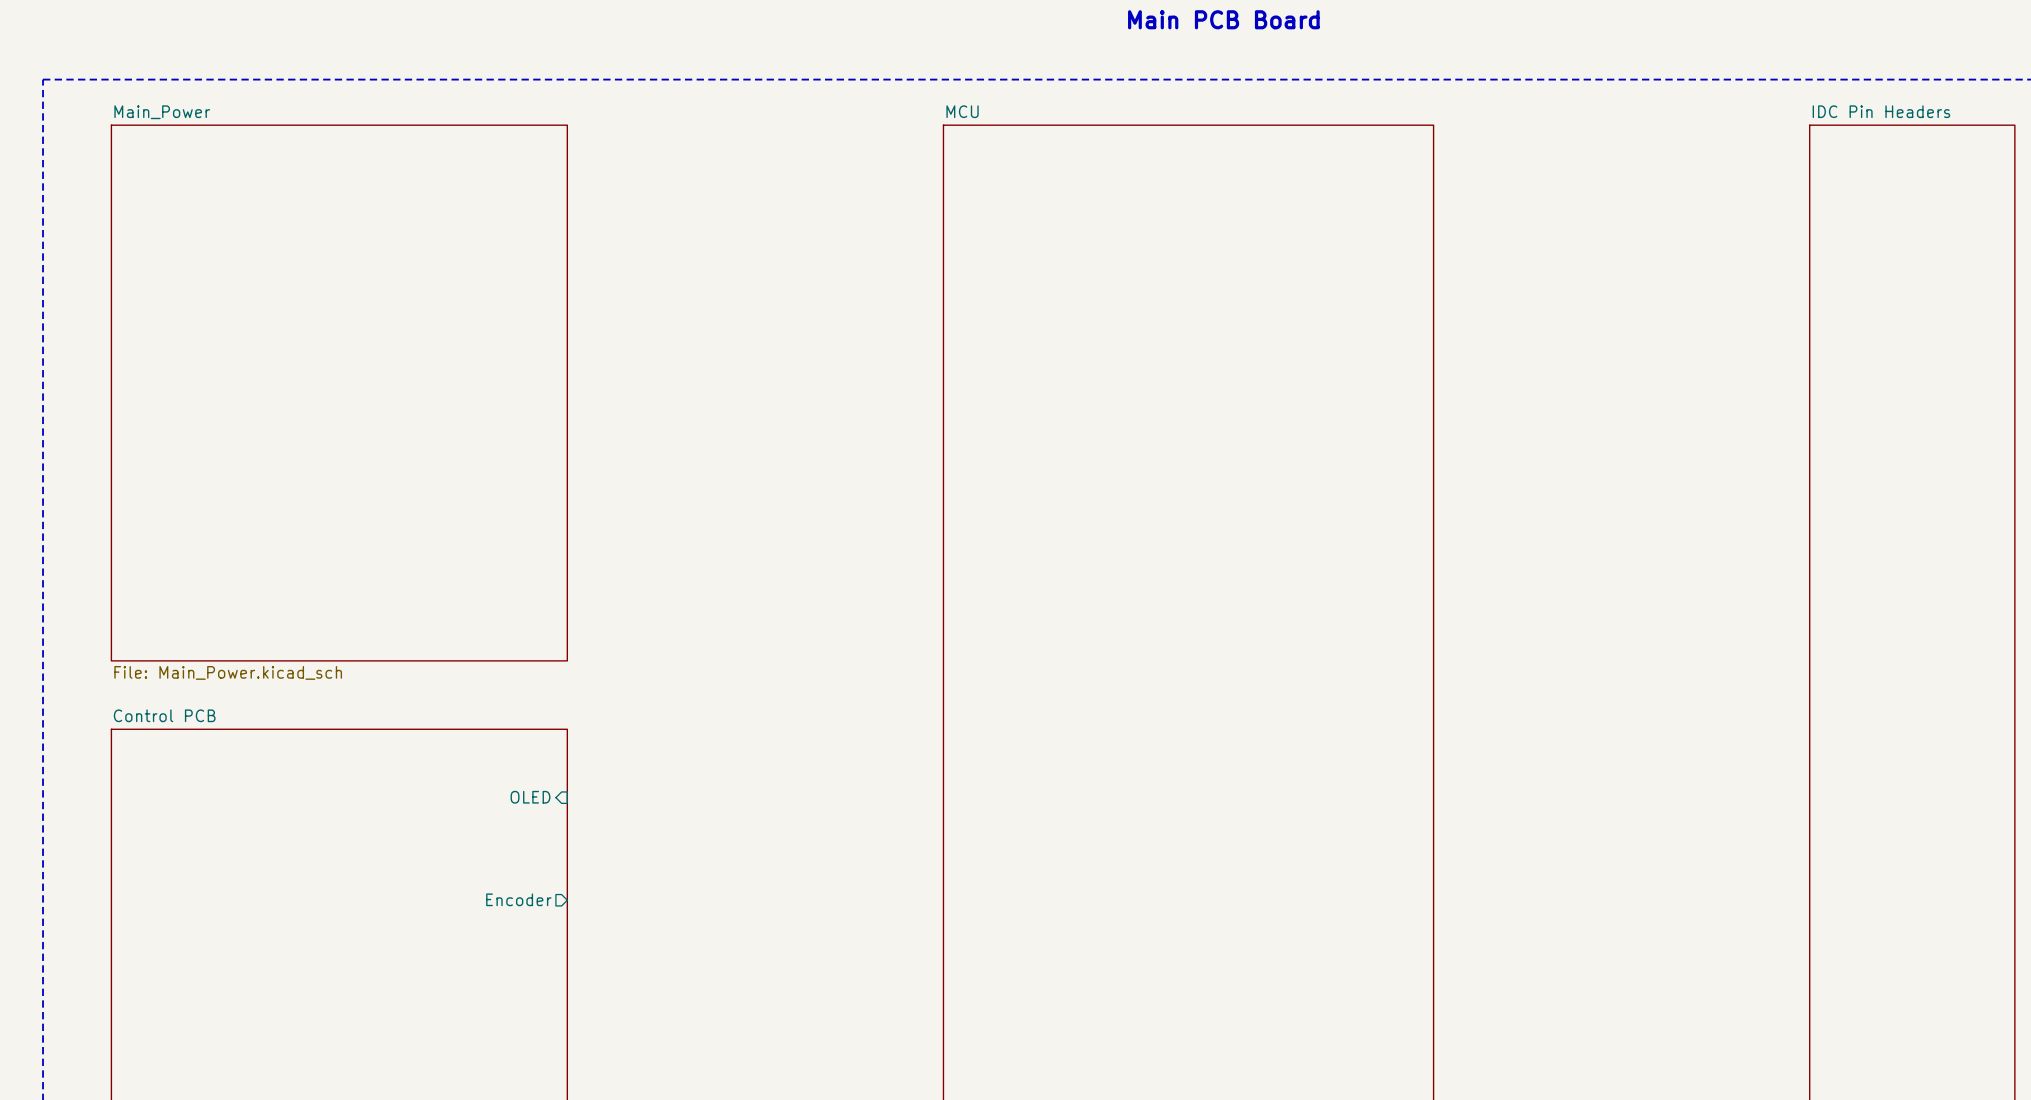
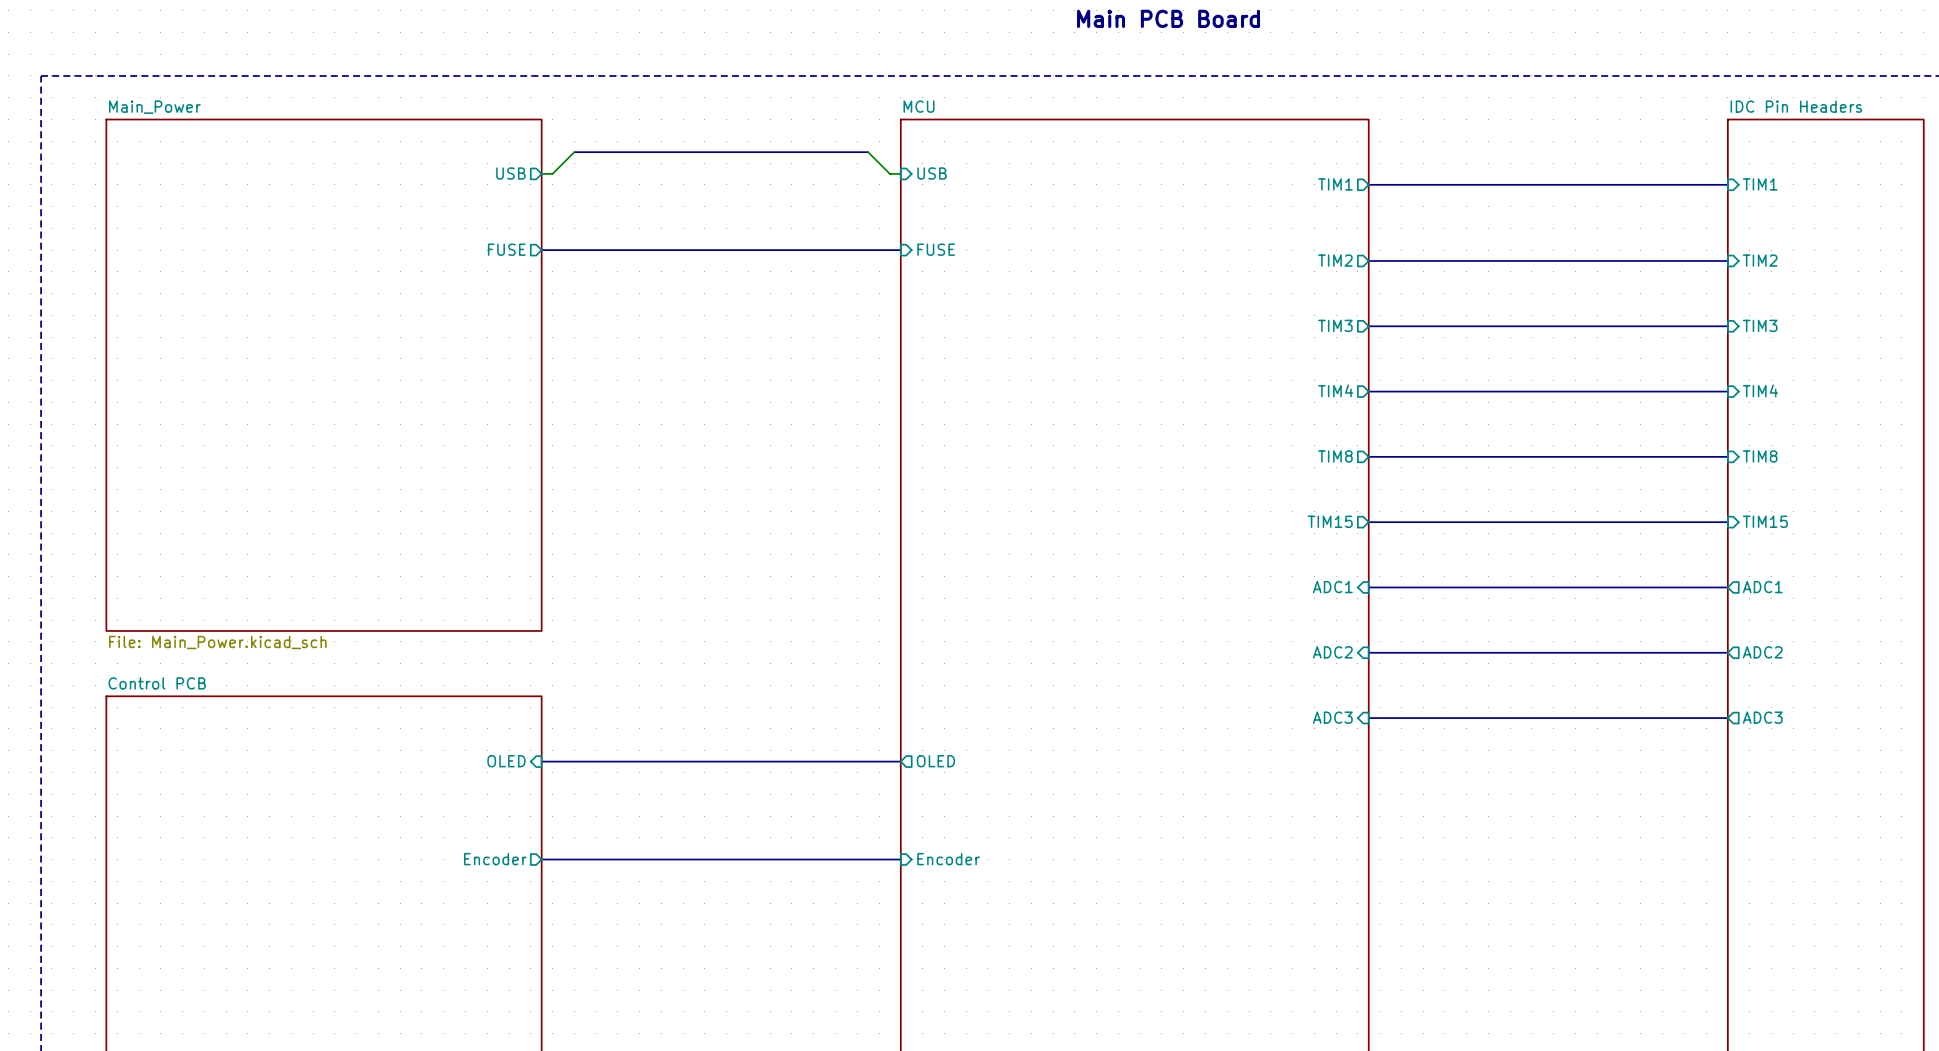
wire: none -> (574, 152) (552, 173) (541, 173)
bus: none -> (574, 152) (868, 152)
wire: none -> (868, 152) (889, 173) (900, 173)
sheet pin: none -> USB (510, 173)
sheet pin: none -> USB (932, 173)
sheet pin: none -> TIM1 (1335, 184)
bus: none -> (1368, 184) (1727, 184)
sheet pin: none -> TIM1 (1760, 184)
sheet pin: none -> FUSE (506, 249)
bus: none -> (541, 250) (900, 250)
sheet pin: none -> FUSE (936, 249)
sheet pin: none -> TIM2 (1335, 260)
sheet pin: none -> TIM2 (1760, 260)
bus: none -> (1368, 260) (1727, 260)
sheet pin: none -> TIM3 (1335, 325)
bus: none -> (1368, 326) (1727, 326)
sheet pin: none -> TIM3 (1760, 325)
sheet pin: none -> TIM4 (1335, 390)
sheet pin: none -> TIM4 (1760, 390)
bus: none -> (1368, 391) (1727, 391)
sheet pin: none -> TIM8 (1335, 456)
bus: none -> (1368, 456) (1727, 456)
sheet pin: none -> TIM8 (1760, 456)
sheet pin: none -> TIM15 (1330, 521)
bus: none -> (1368, 522) (1727, 522)
sheet pin: none -> TIM15 (1765, 521)
sheet pin: none -> ADC1 (1332, 587)
sheet pin: none -> ADC1 (1762, 587)
bus: none -> (1368, 587) (1727, 587)
sheet pin: none -> ADC2 (1332, 652)
bus: none -> (1368, 652) (1727, 652)
sheet pin: none -> ADC2 (1762, 652)
sheet pin: none -> ADC3 (1332, 717)
sheet pin: none -> ADC3 (1762, 717)
bus: none -> (1368, 718) (1727, 718)
bus: none -> (541, 761) (900, 761)
sheet pin: none -> OLED (935, 761)
sheet pin: none -> Encoder (948, 859)
bus: none -> (541, 859) (900, 859)

